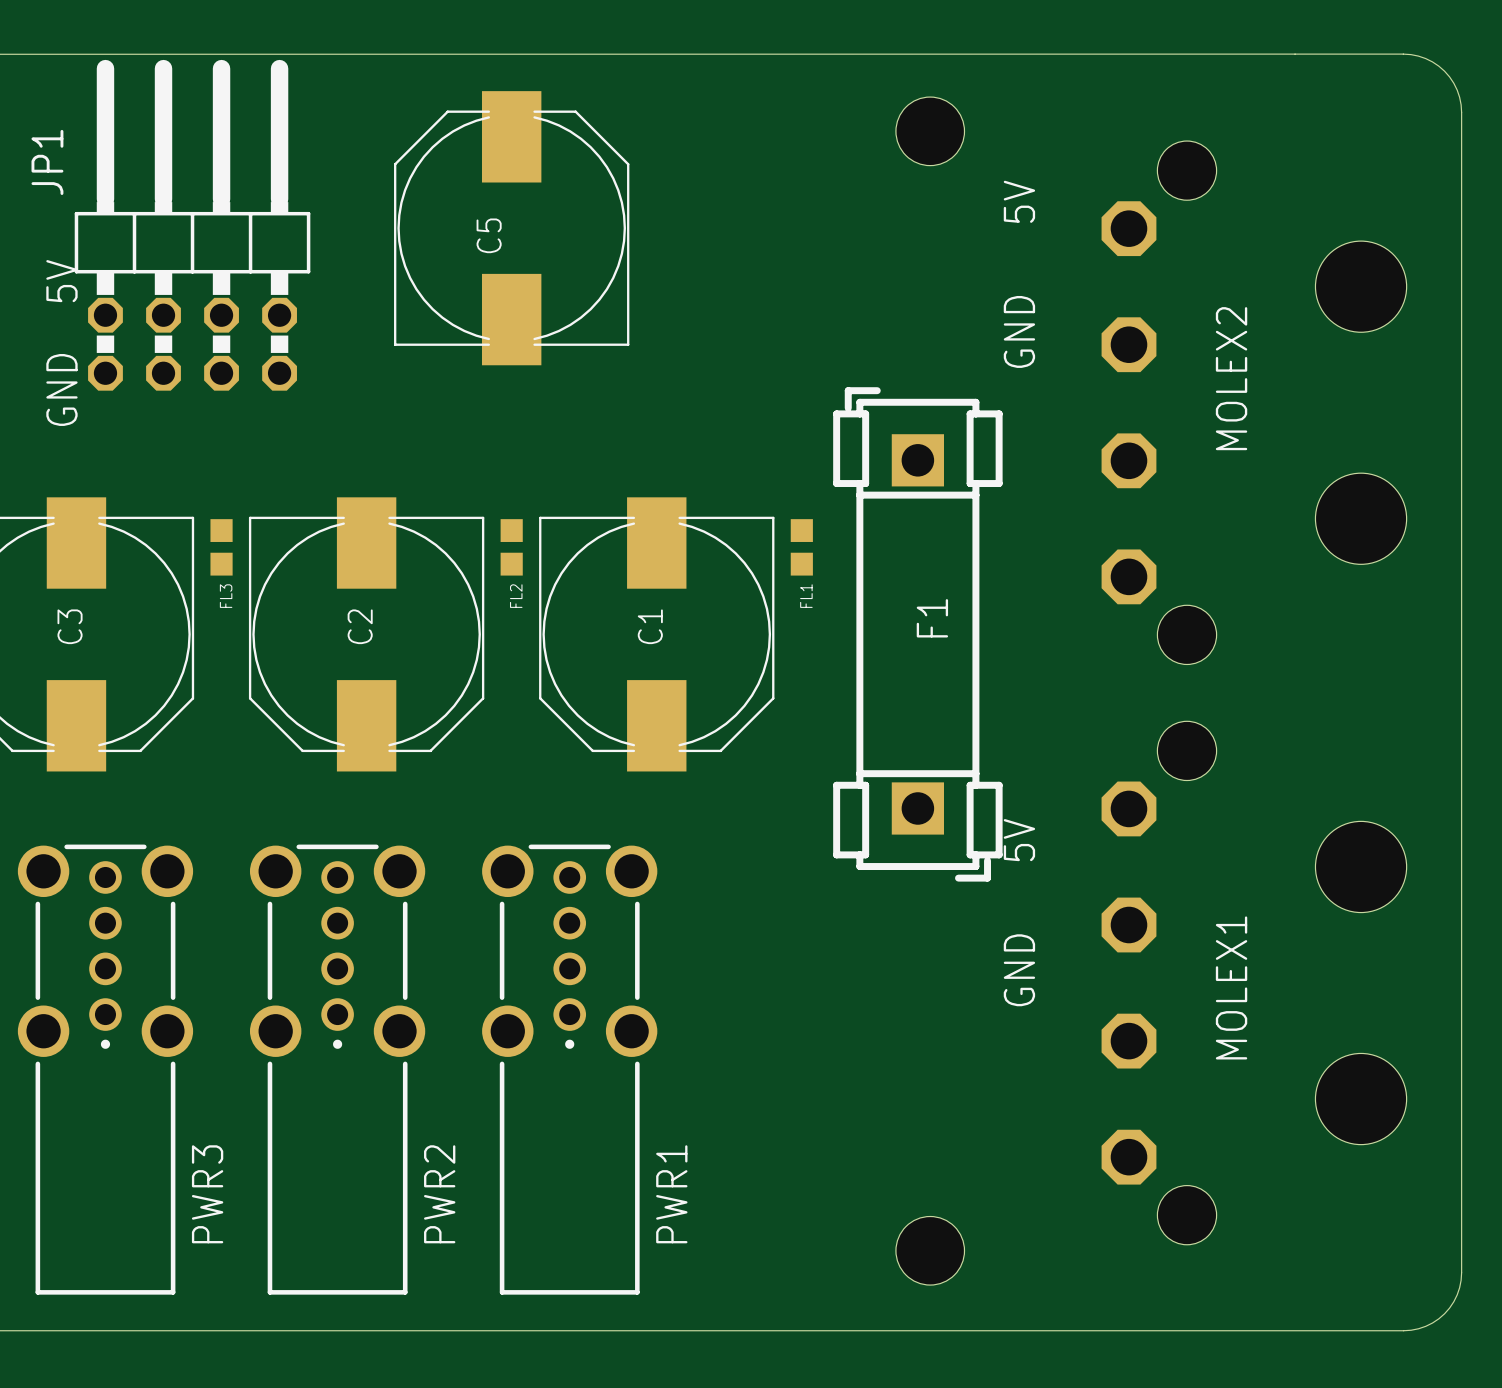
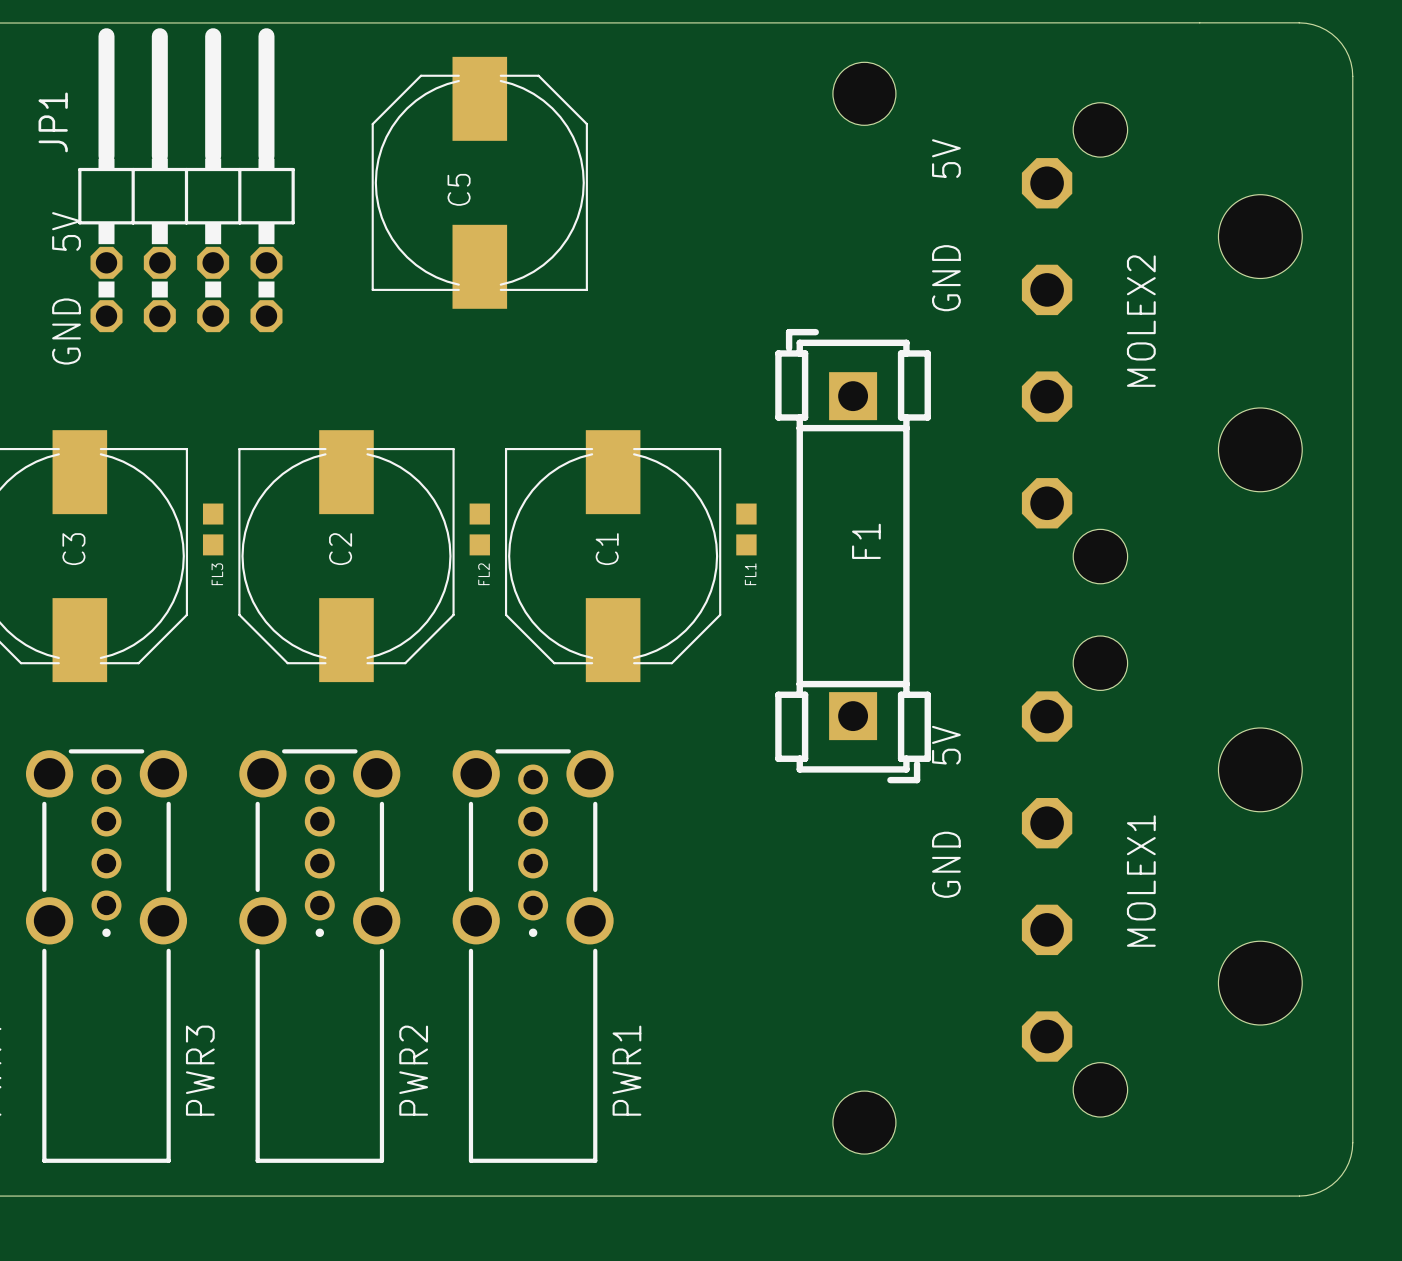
FL3 position: (221, 547) -> (213, 529)
FL2 position: (511, 547) -> (479, 529)
FL1 position: (801, 547) -> (746, 529)

